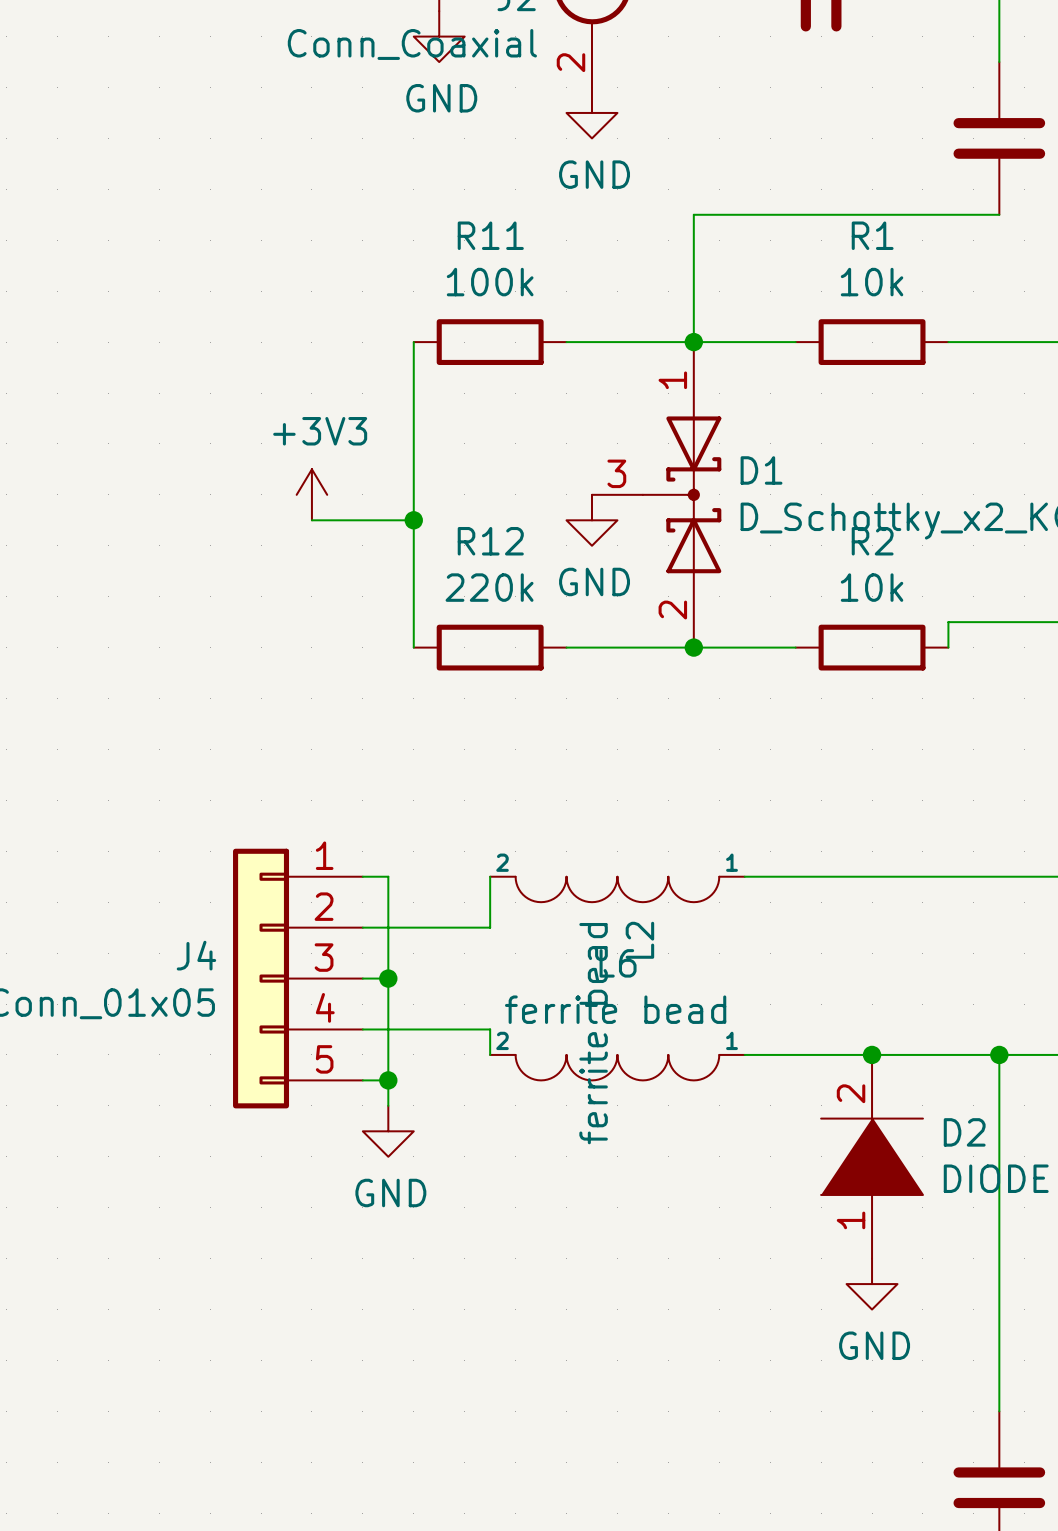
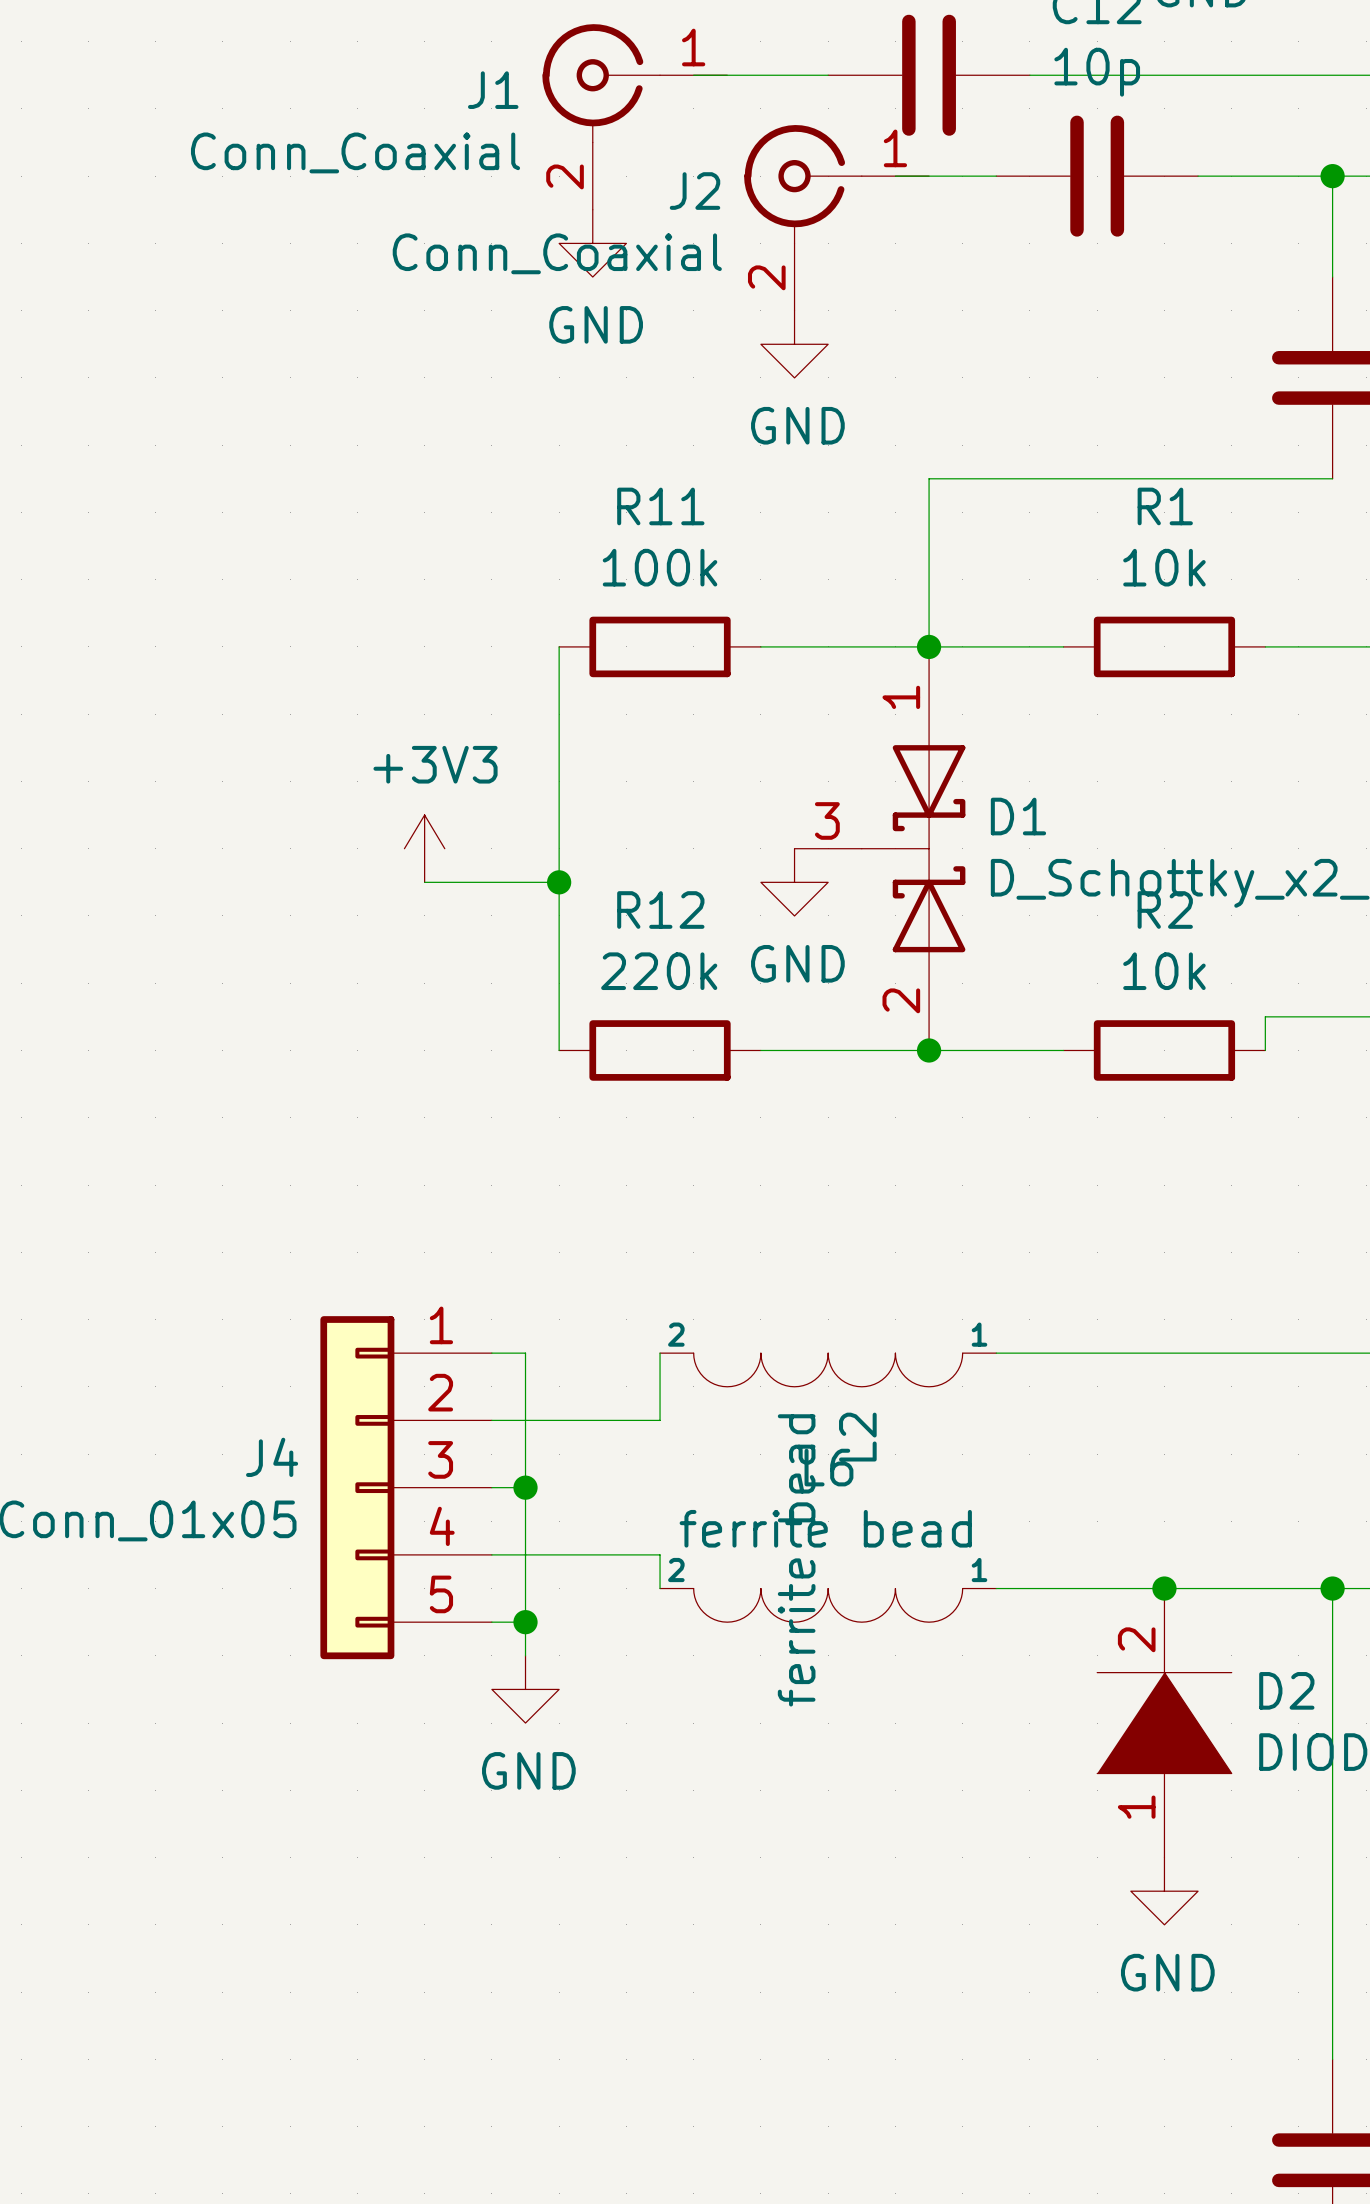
D1 symbol: [591, 342, 722, 648] -> [794, 646, 966, 1051]

